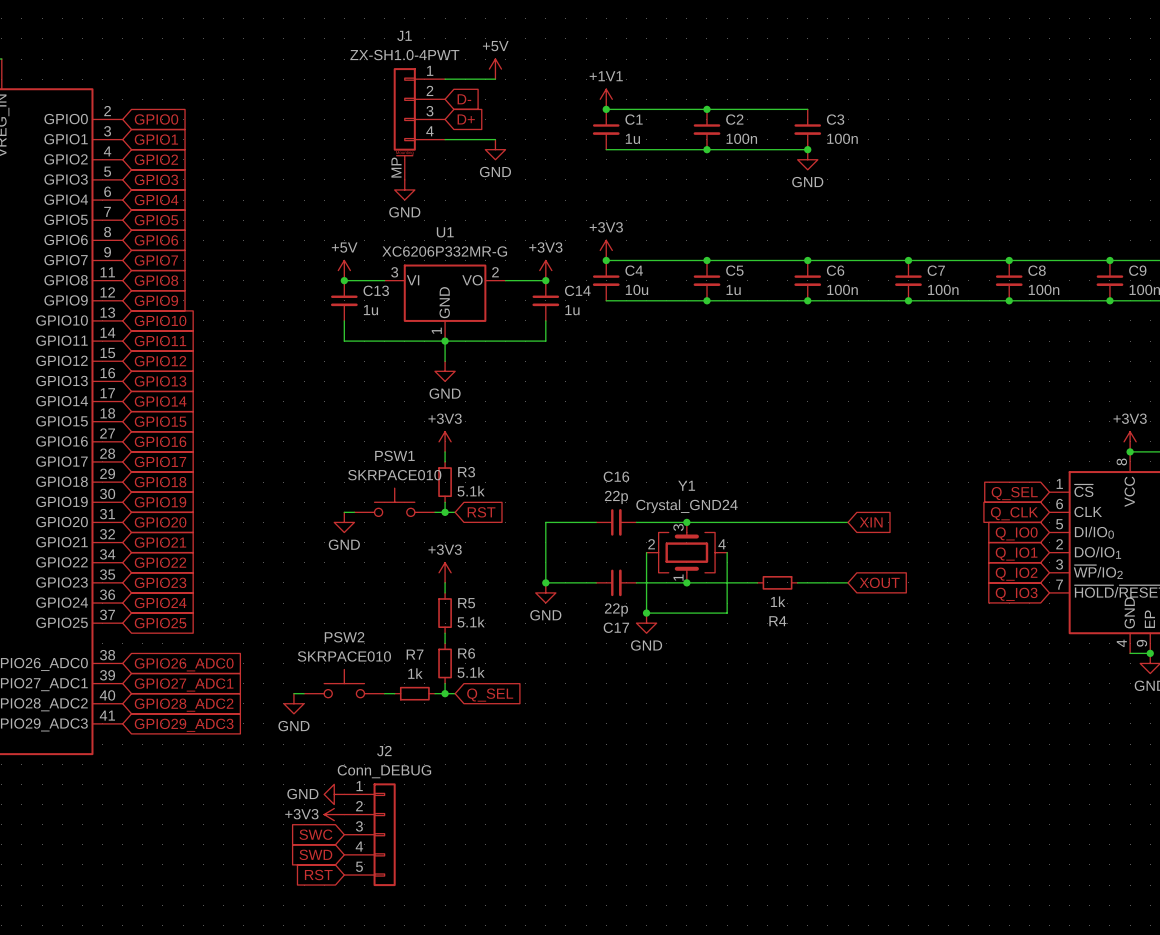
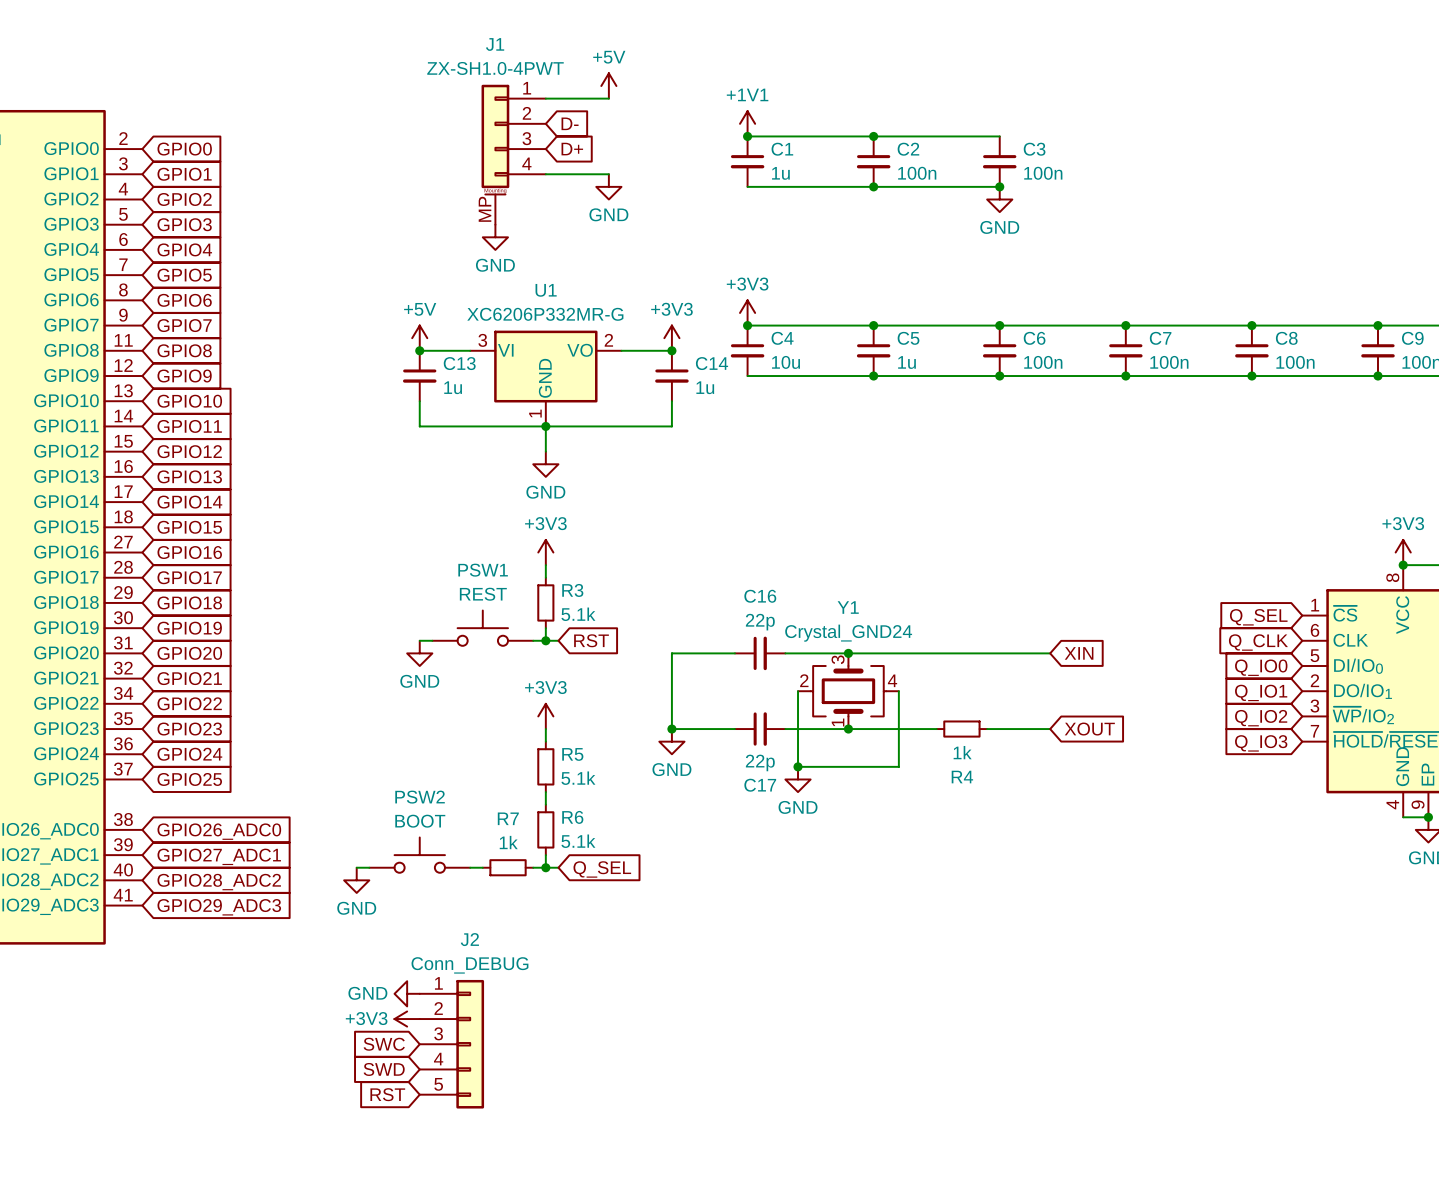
PSW1 value: SKRPACE010 (394, 475) -> REST (483, 594)
PSW2 value: SKRPACE010 (344, 656) -> BOOT (420, 821)

